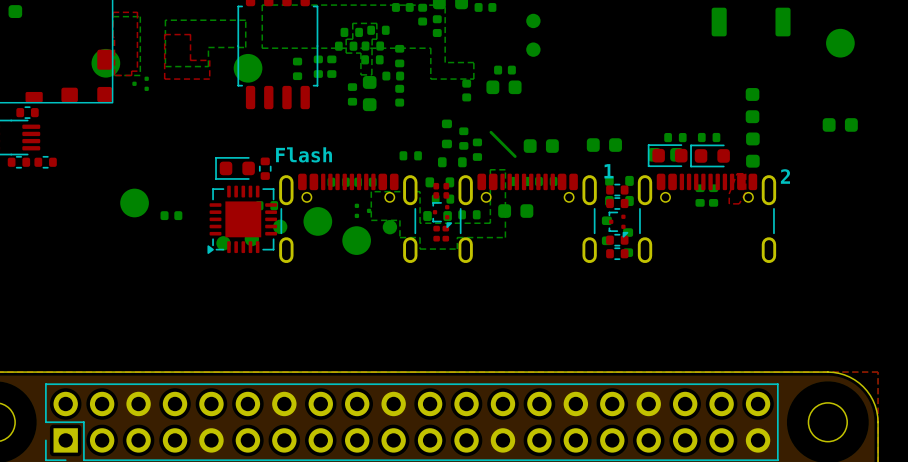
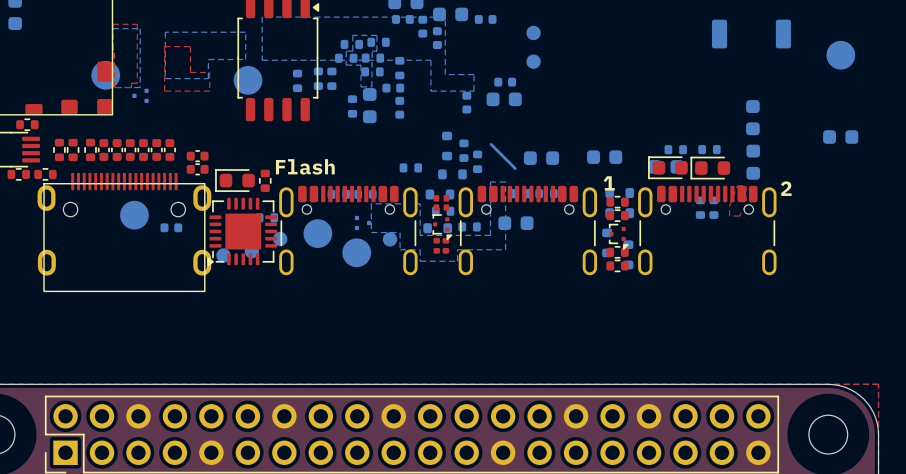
part: none -> (59, 149)
part: none -> (73, 149)
part: none -> (90, 149)
part: none -> (103, 149)
part: none -> (117, 149)
part: none -> (130, 149)
part: none -> (143, 149)
part: none -> (156, 149)
part: none -> (169, 149)
part: none -> (197, 156)
part: none -> (197, 169)
part: none -> (124, 232)

